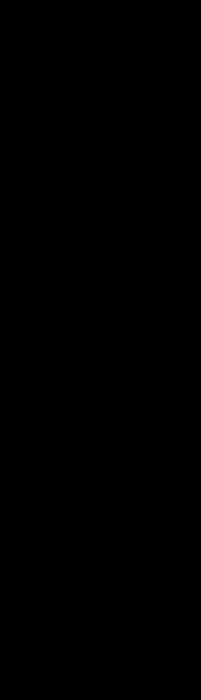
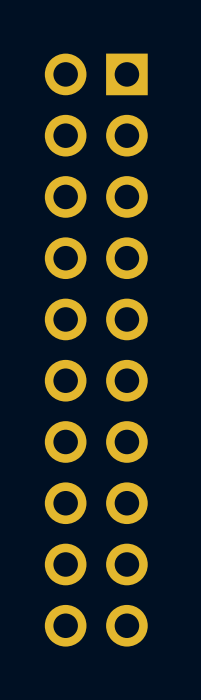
part: none -> (96, 350)

